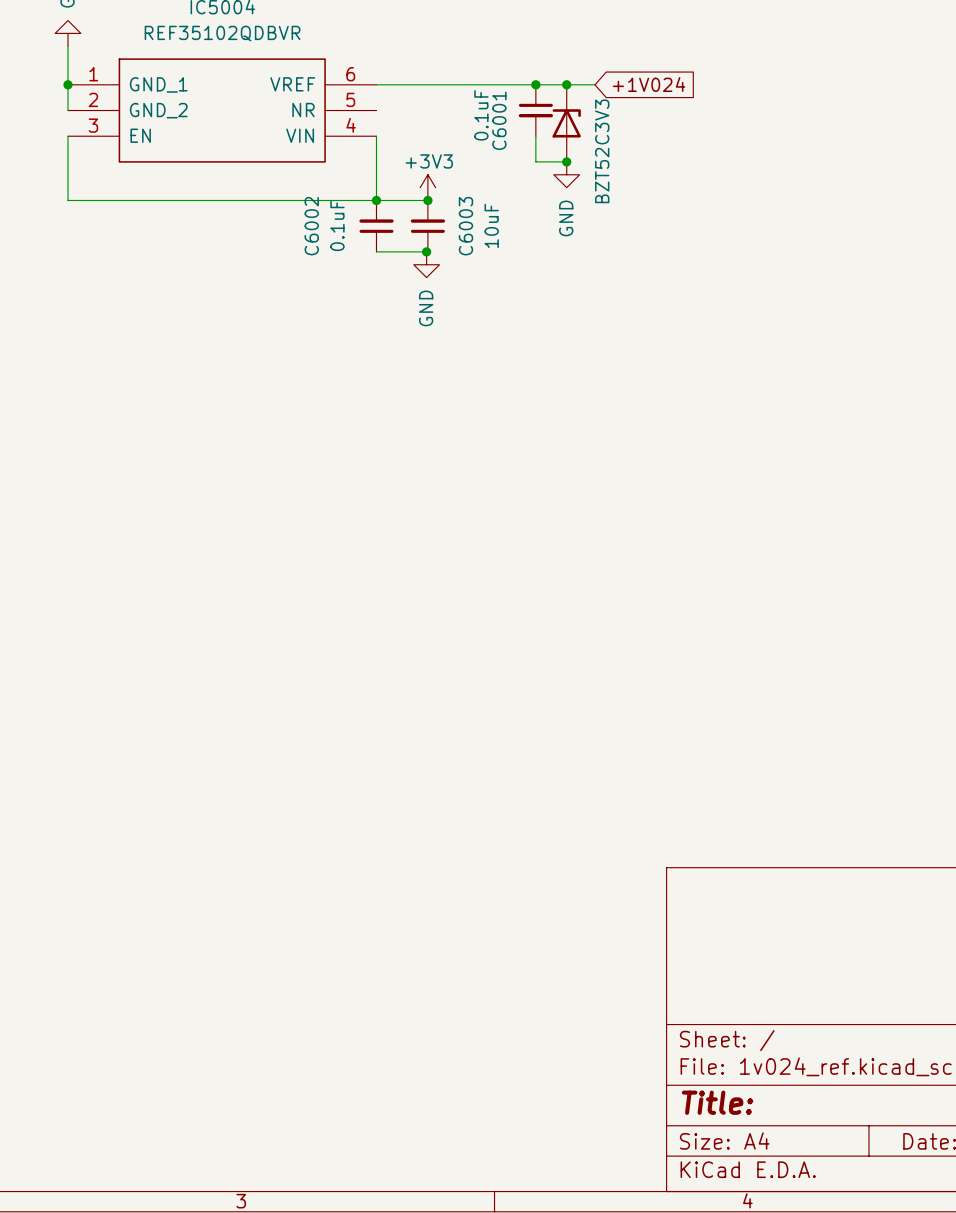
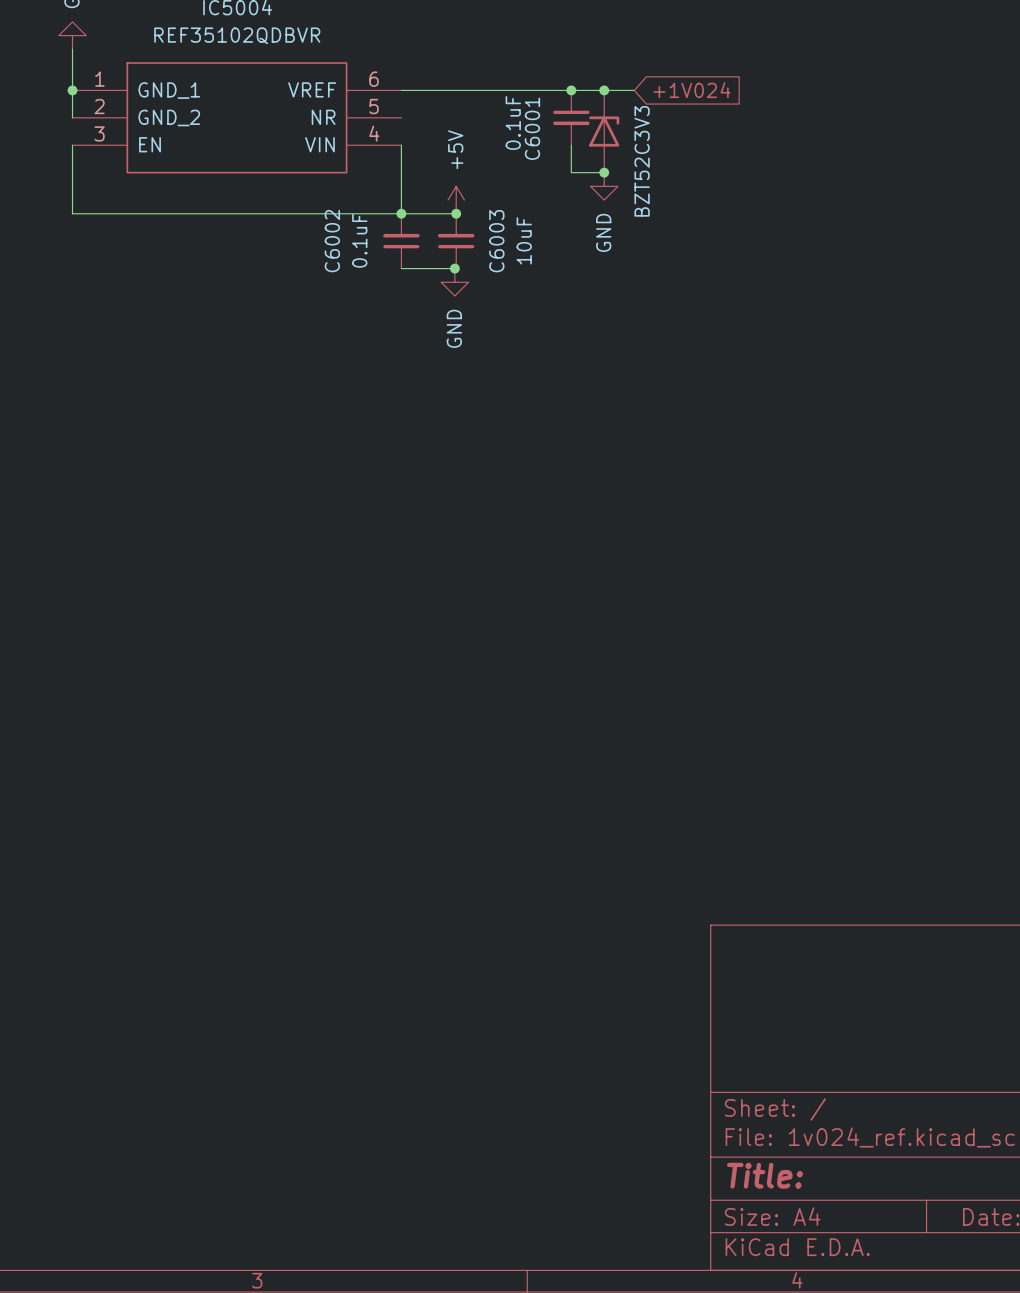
power symbol: +3V3 (427, 187) -> +5V (456, 200)

